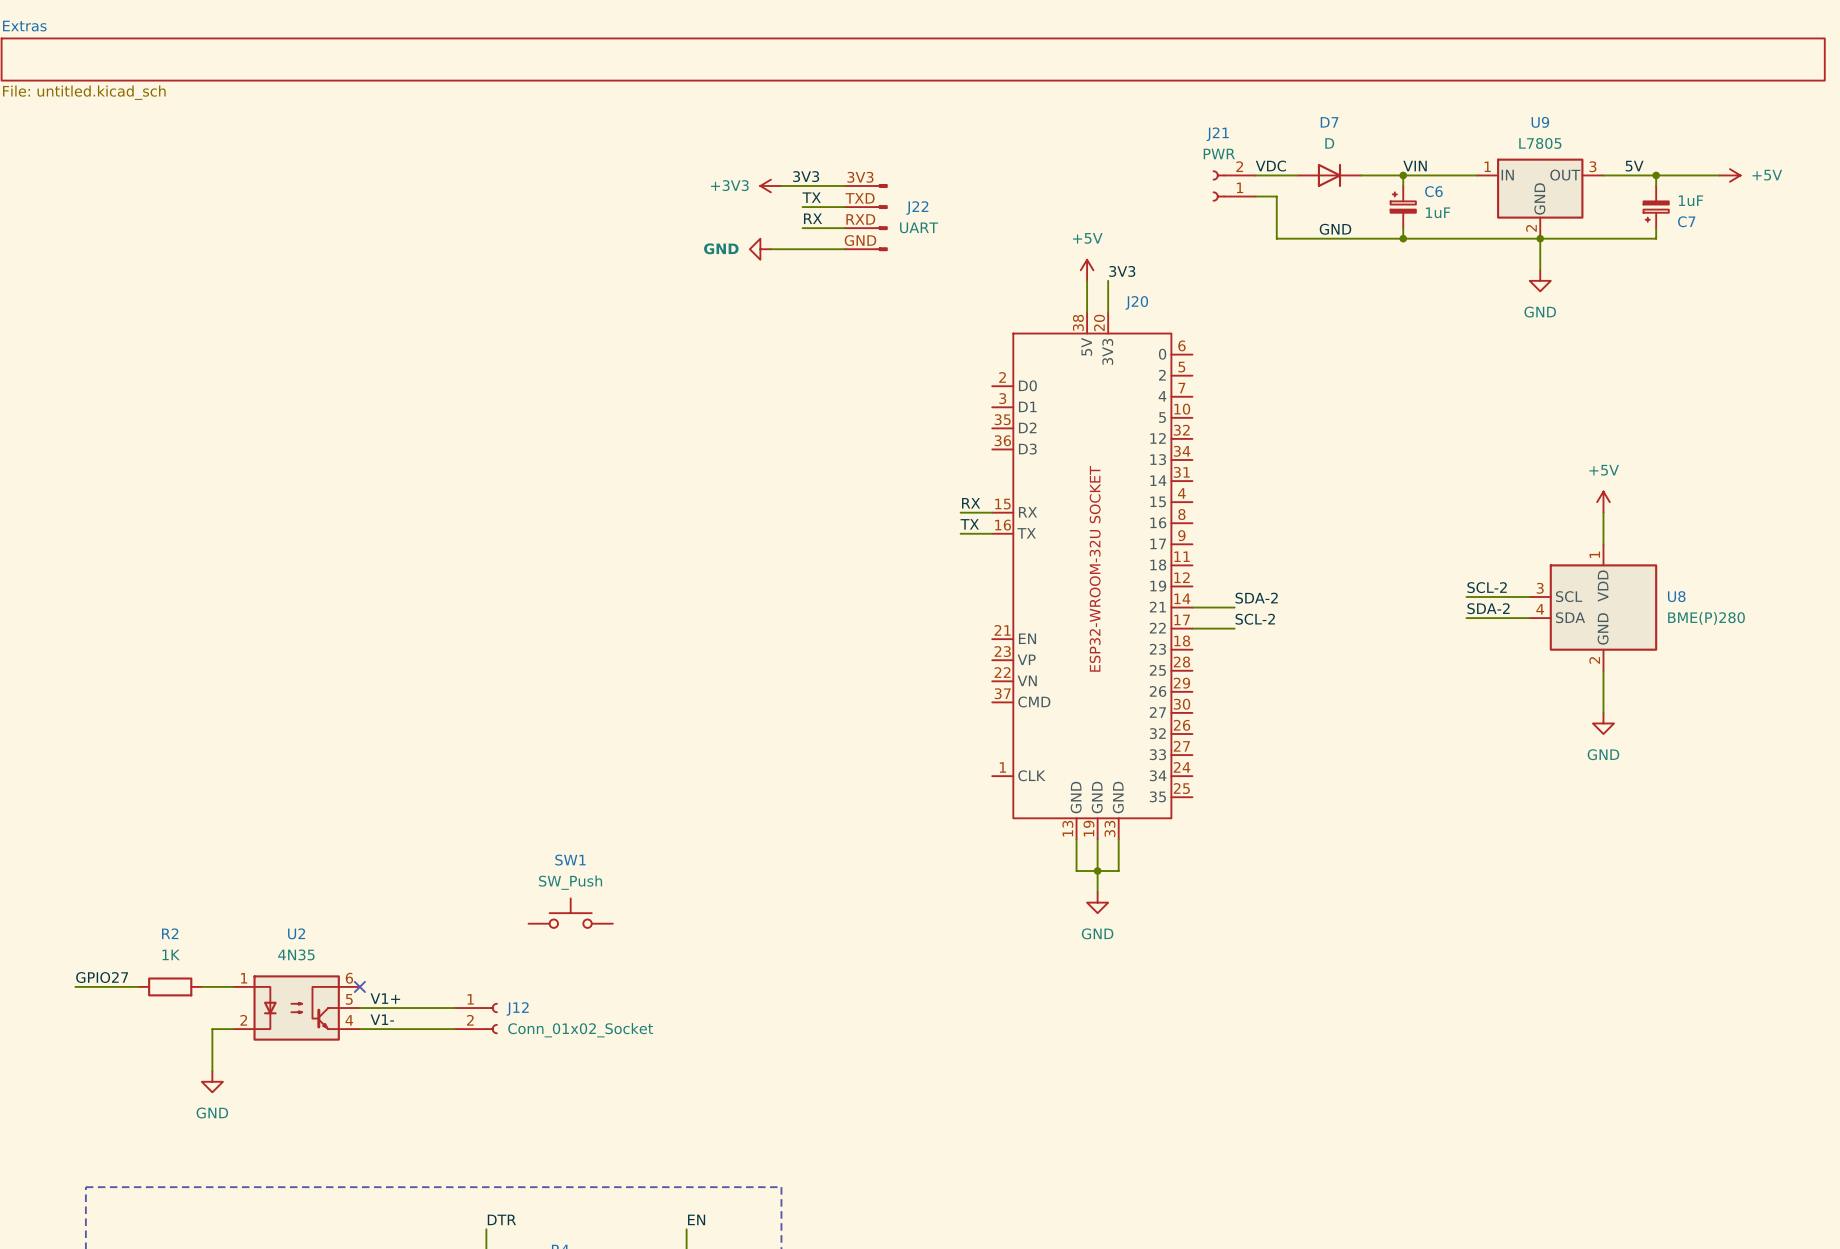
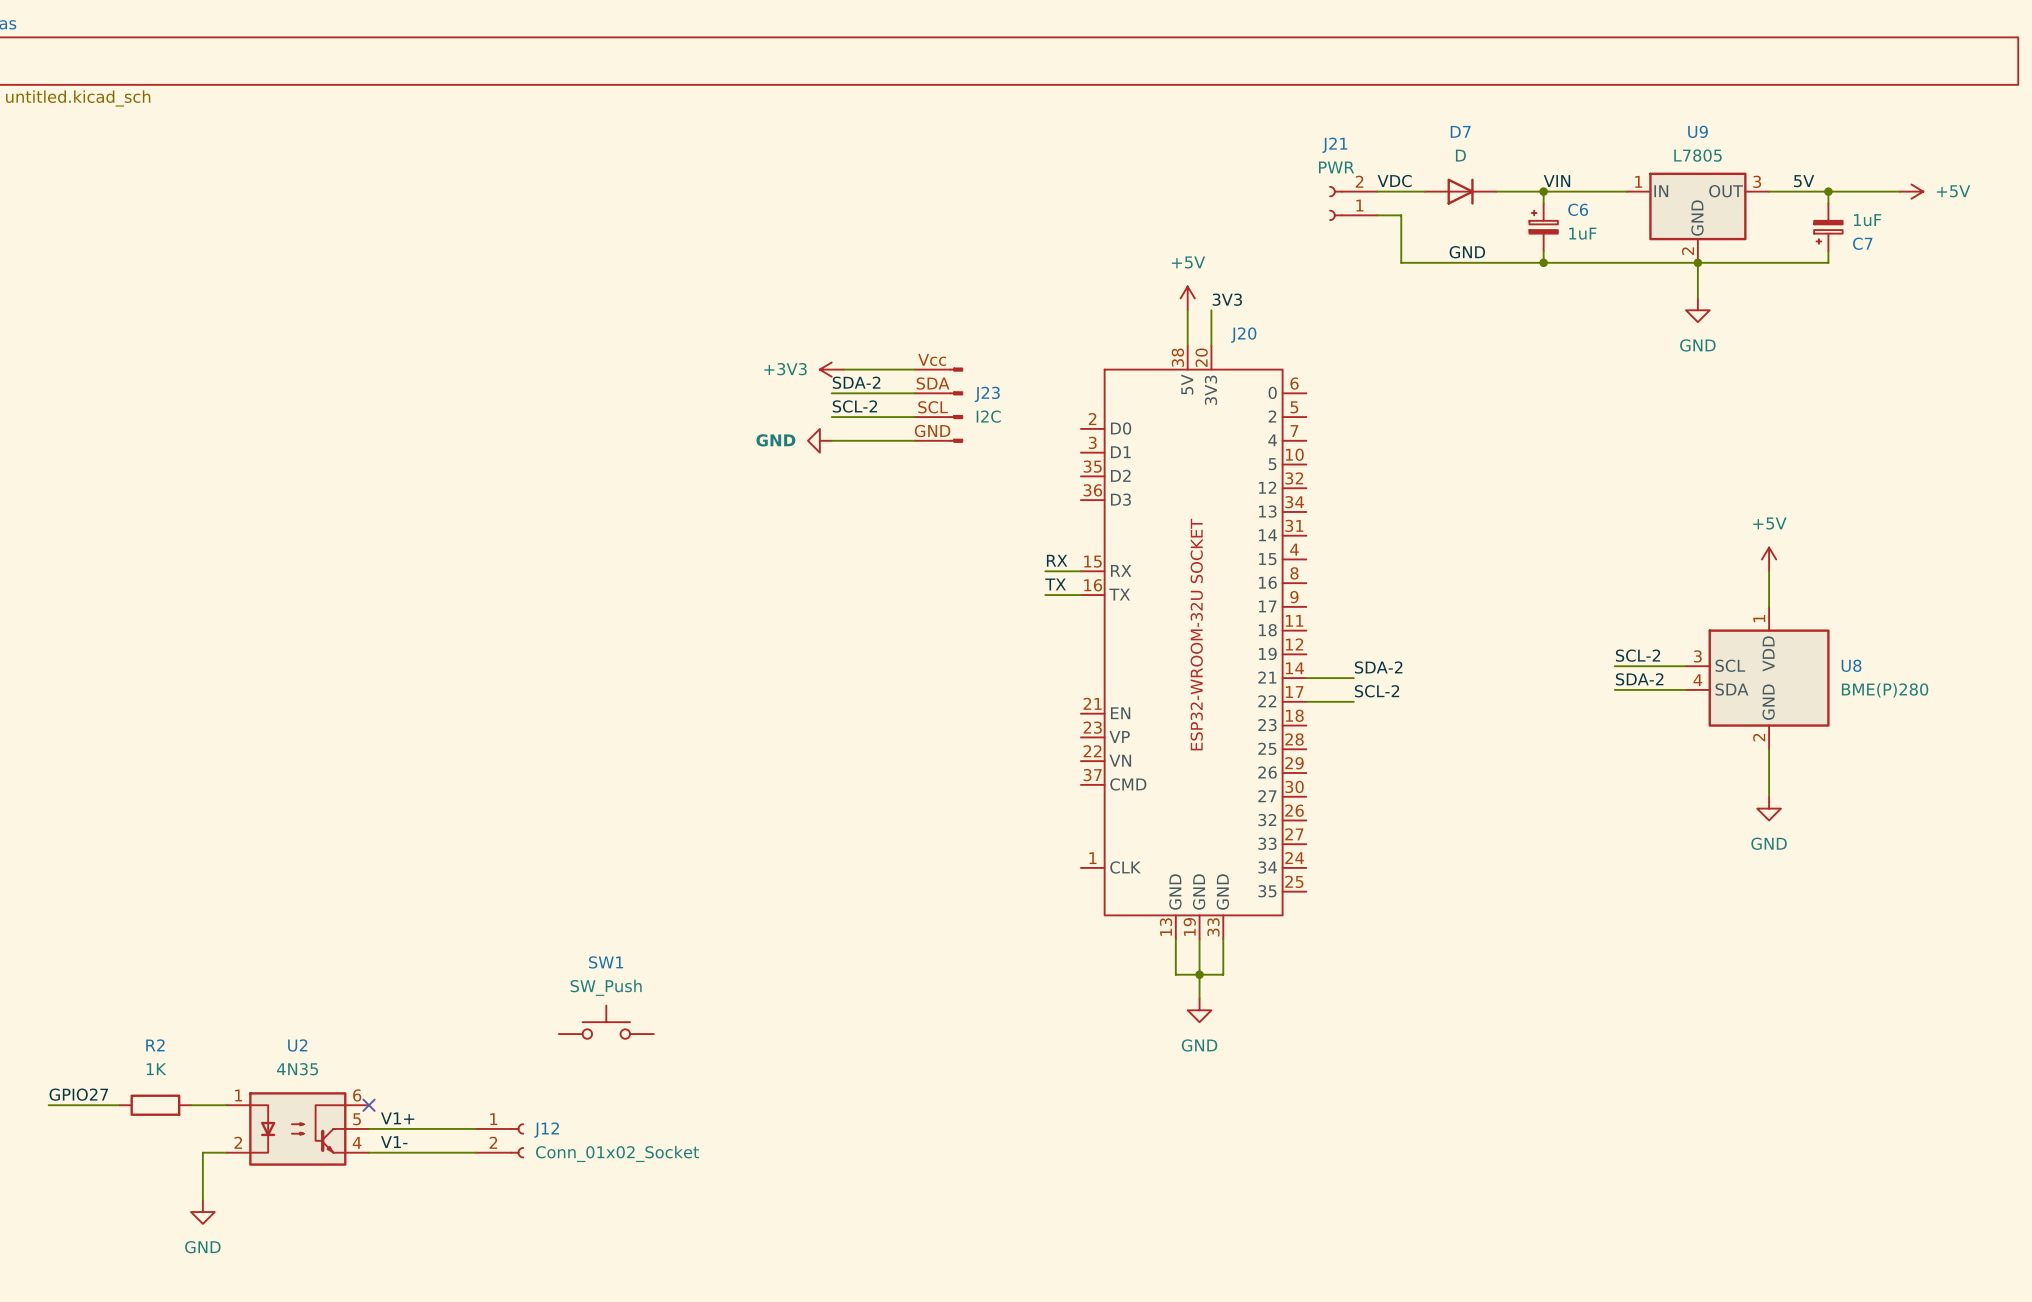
label: 3V3 (806, 176) -> none
power symbol position: +3V3 (770, 185) -> +3V3 (831, 369)
wire: (781, 185) (844, 185) -> (843, 369) (914, 369)
label: TX (811, 197) -> none
wire: (802, 207) (844, 207) -> none
J22: UART (866, 217) -> none
label: RX (812, 218) -> none
wire: (802, 228) (844, 228) -> none
power symbol position: GND (760, 249) -> GND (819, 440)
wire: (770, 249) (844, 249) -> (831, 440) (914, 440)
label: none -> SDA-2 (856, 382)
wire: none -> (831, 393) (914, 393)
J23: none -> I2C (938, 405)
label: none -> SCL-2 (854, 406)
wire: none -> (831, 417) (914, 417)

